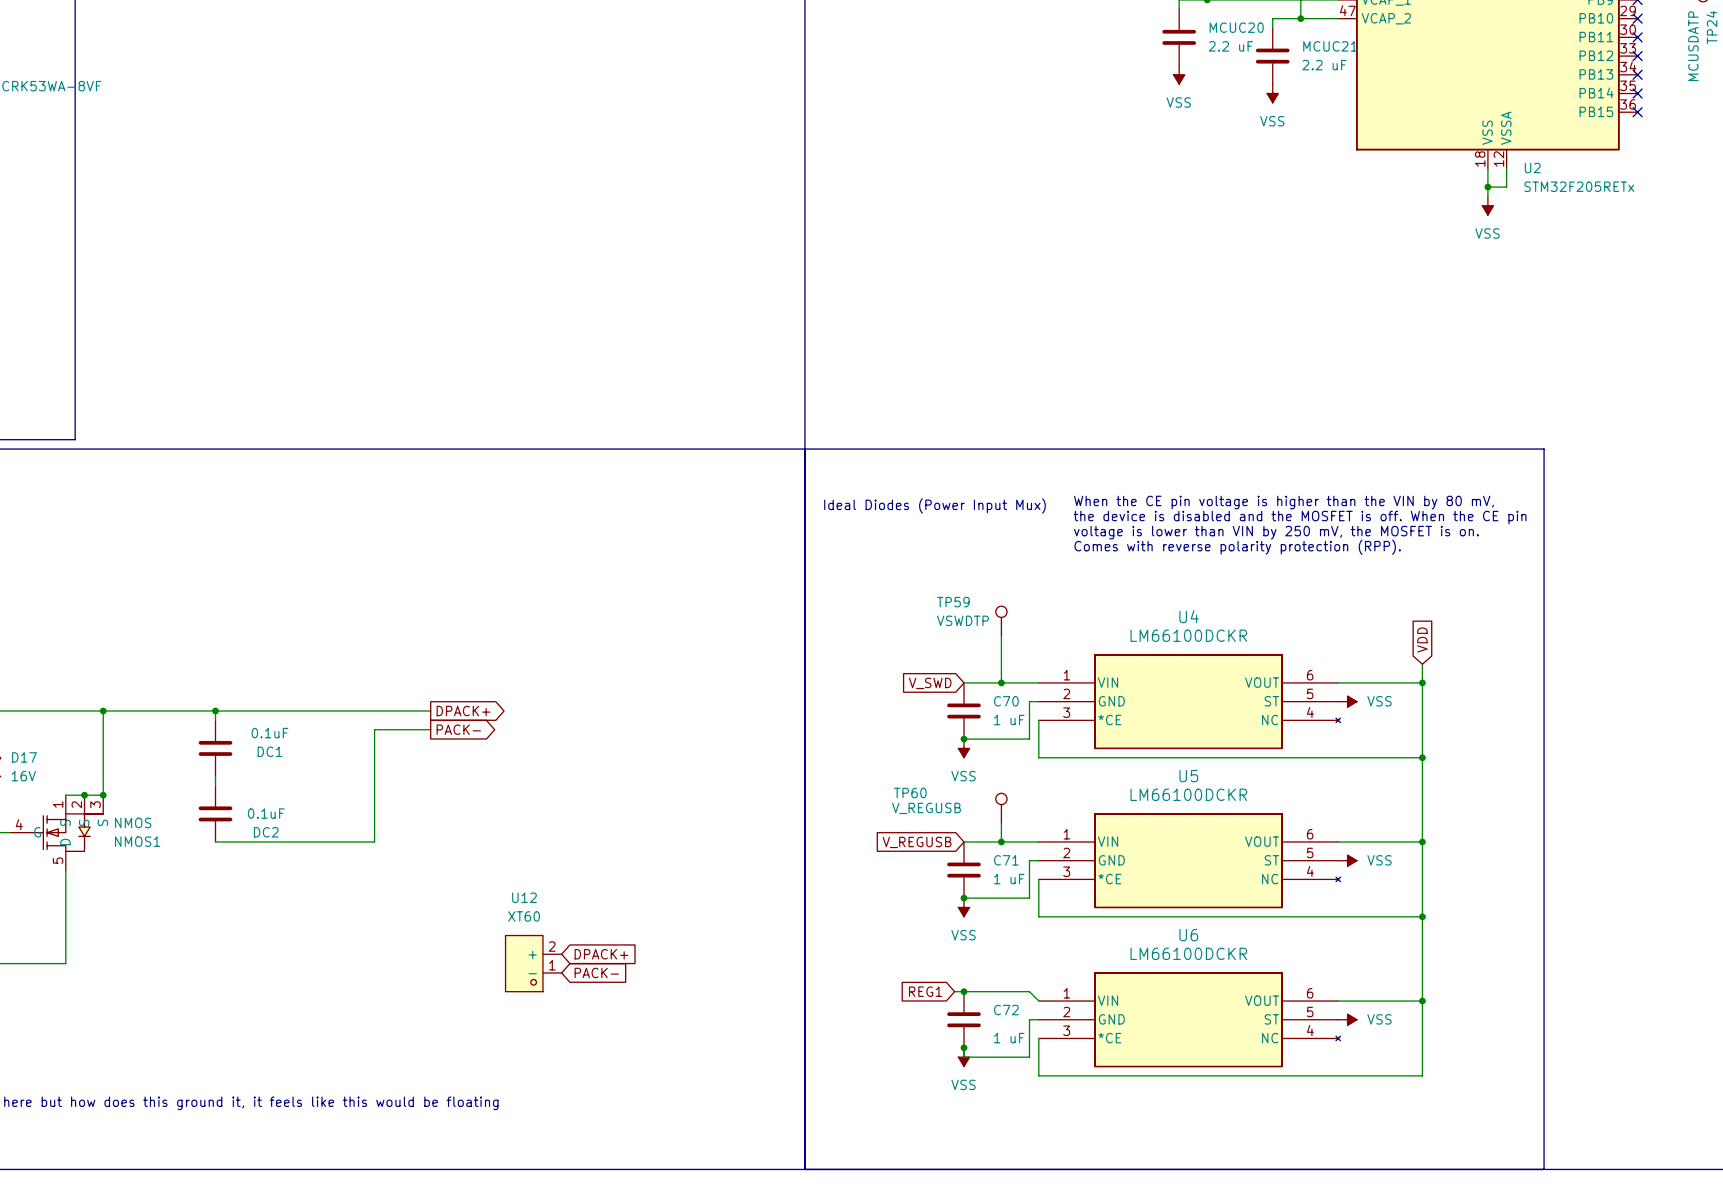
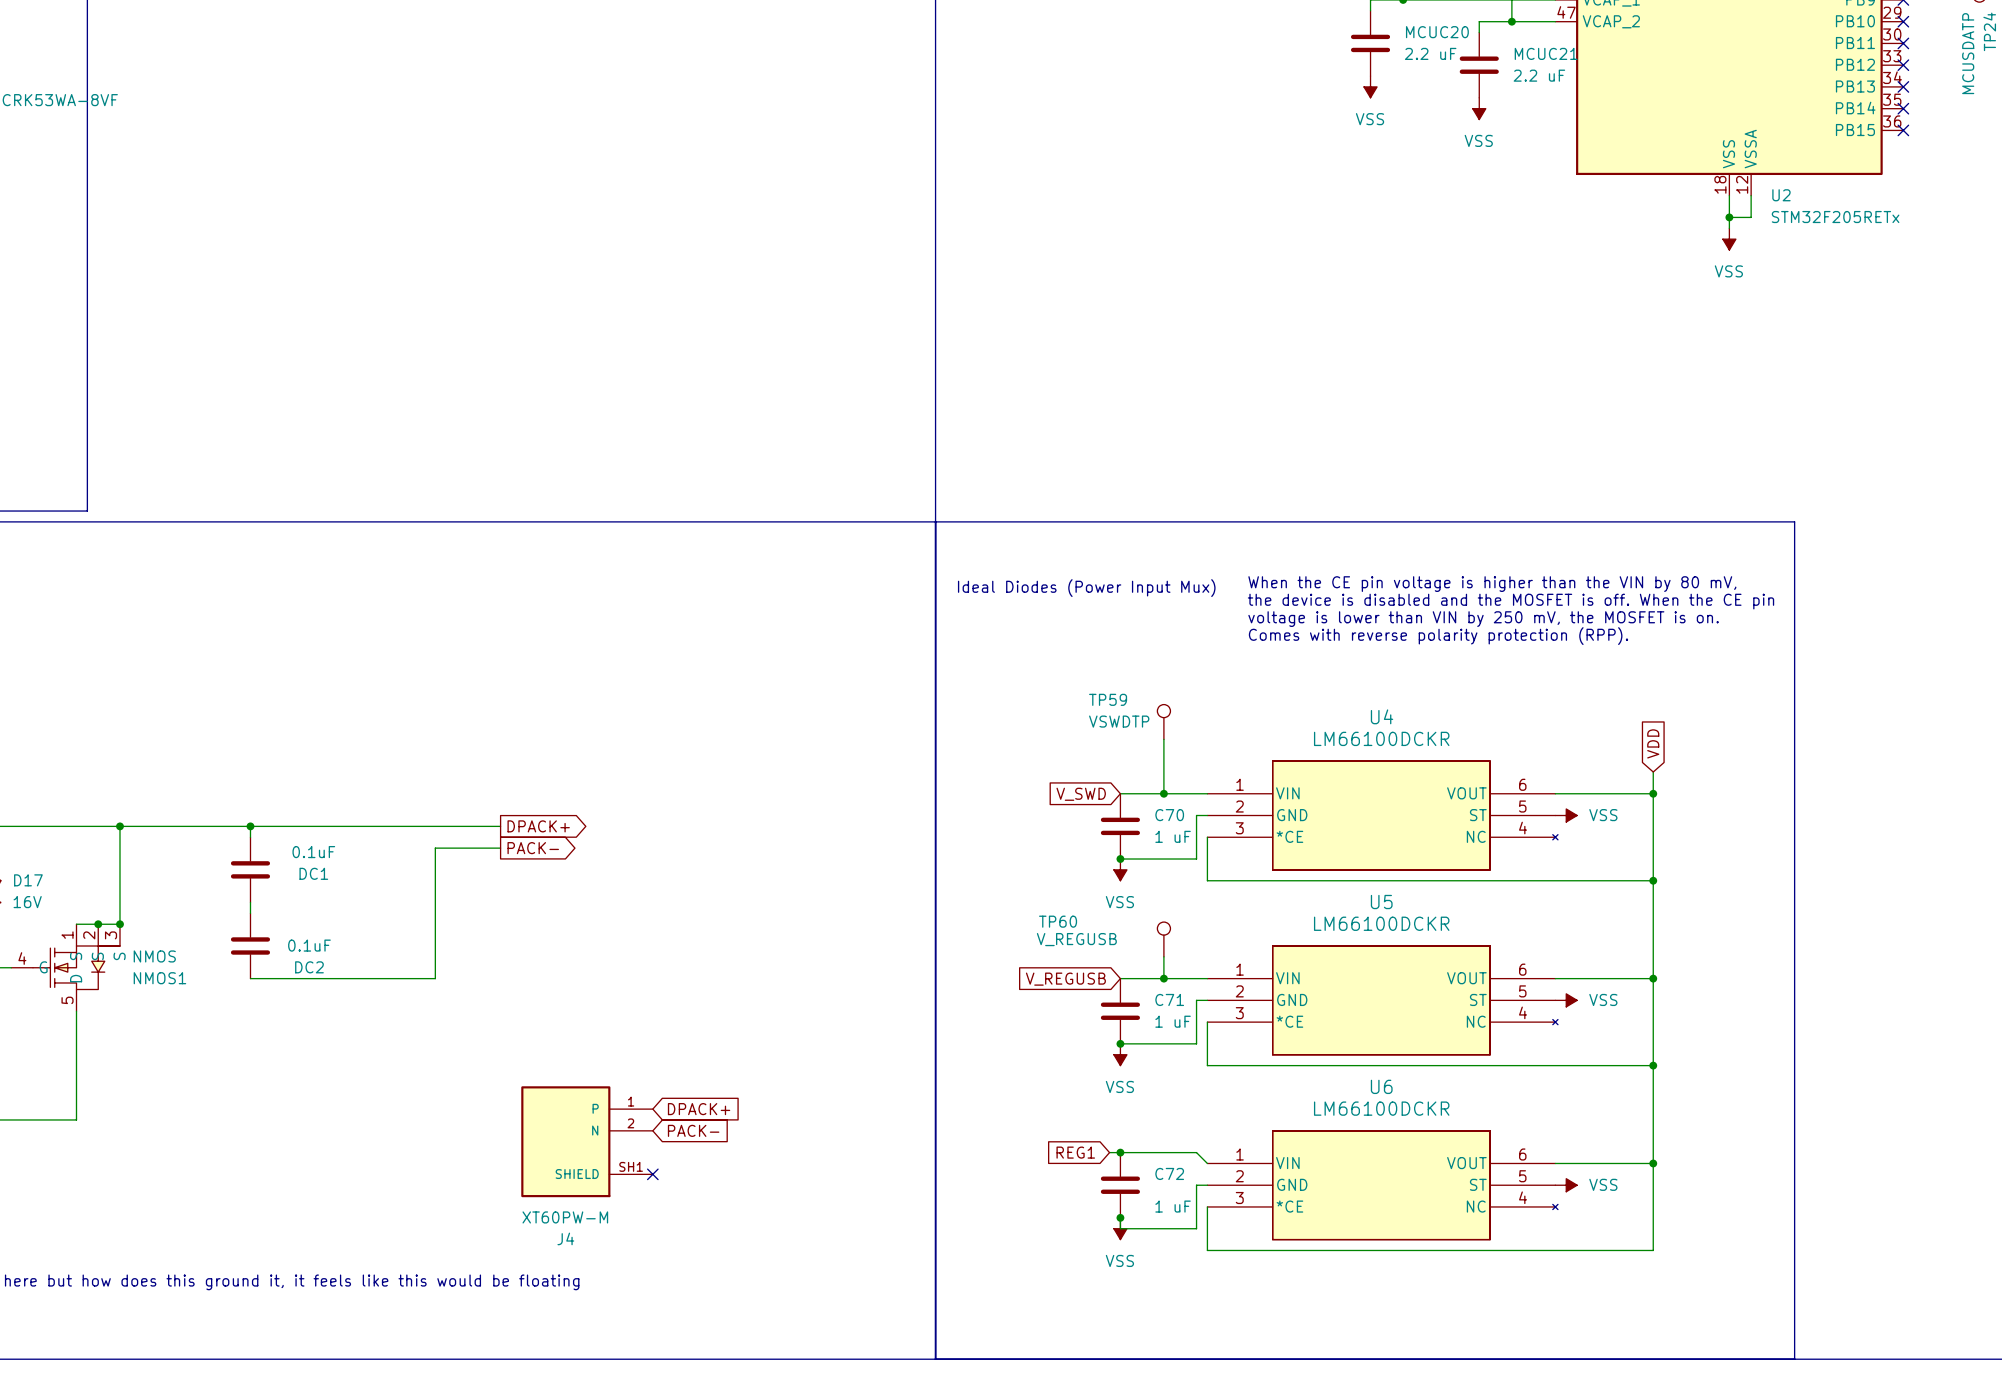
U12: XT60 (533, 963) -> none
J4: none -> XT60PW-M (587, 1141)
no-connect mark: none -> (652, 1174)

